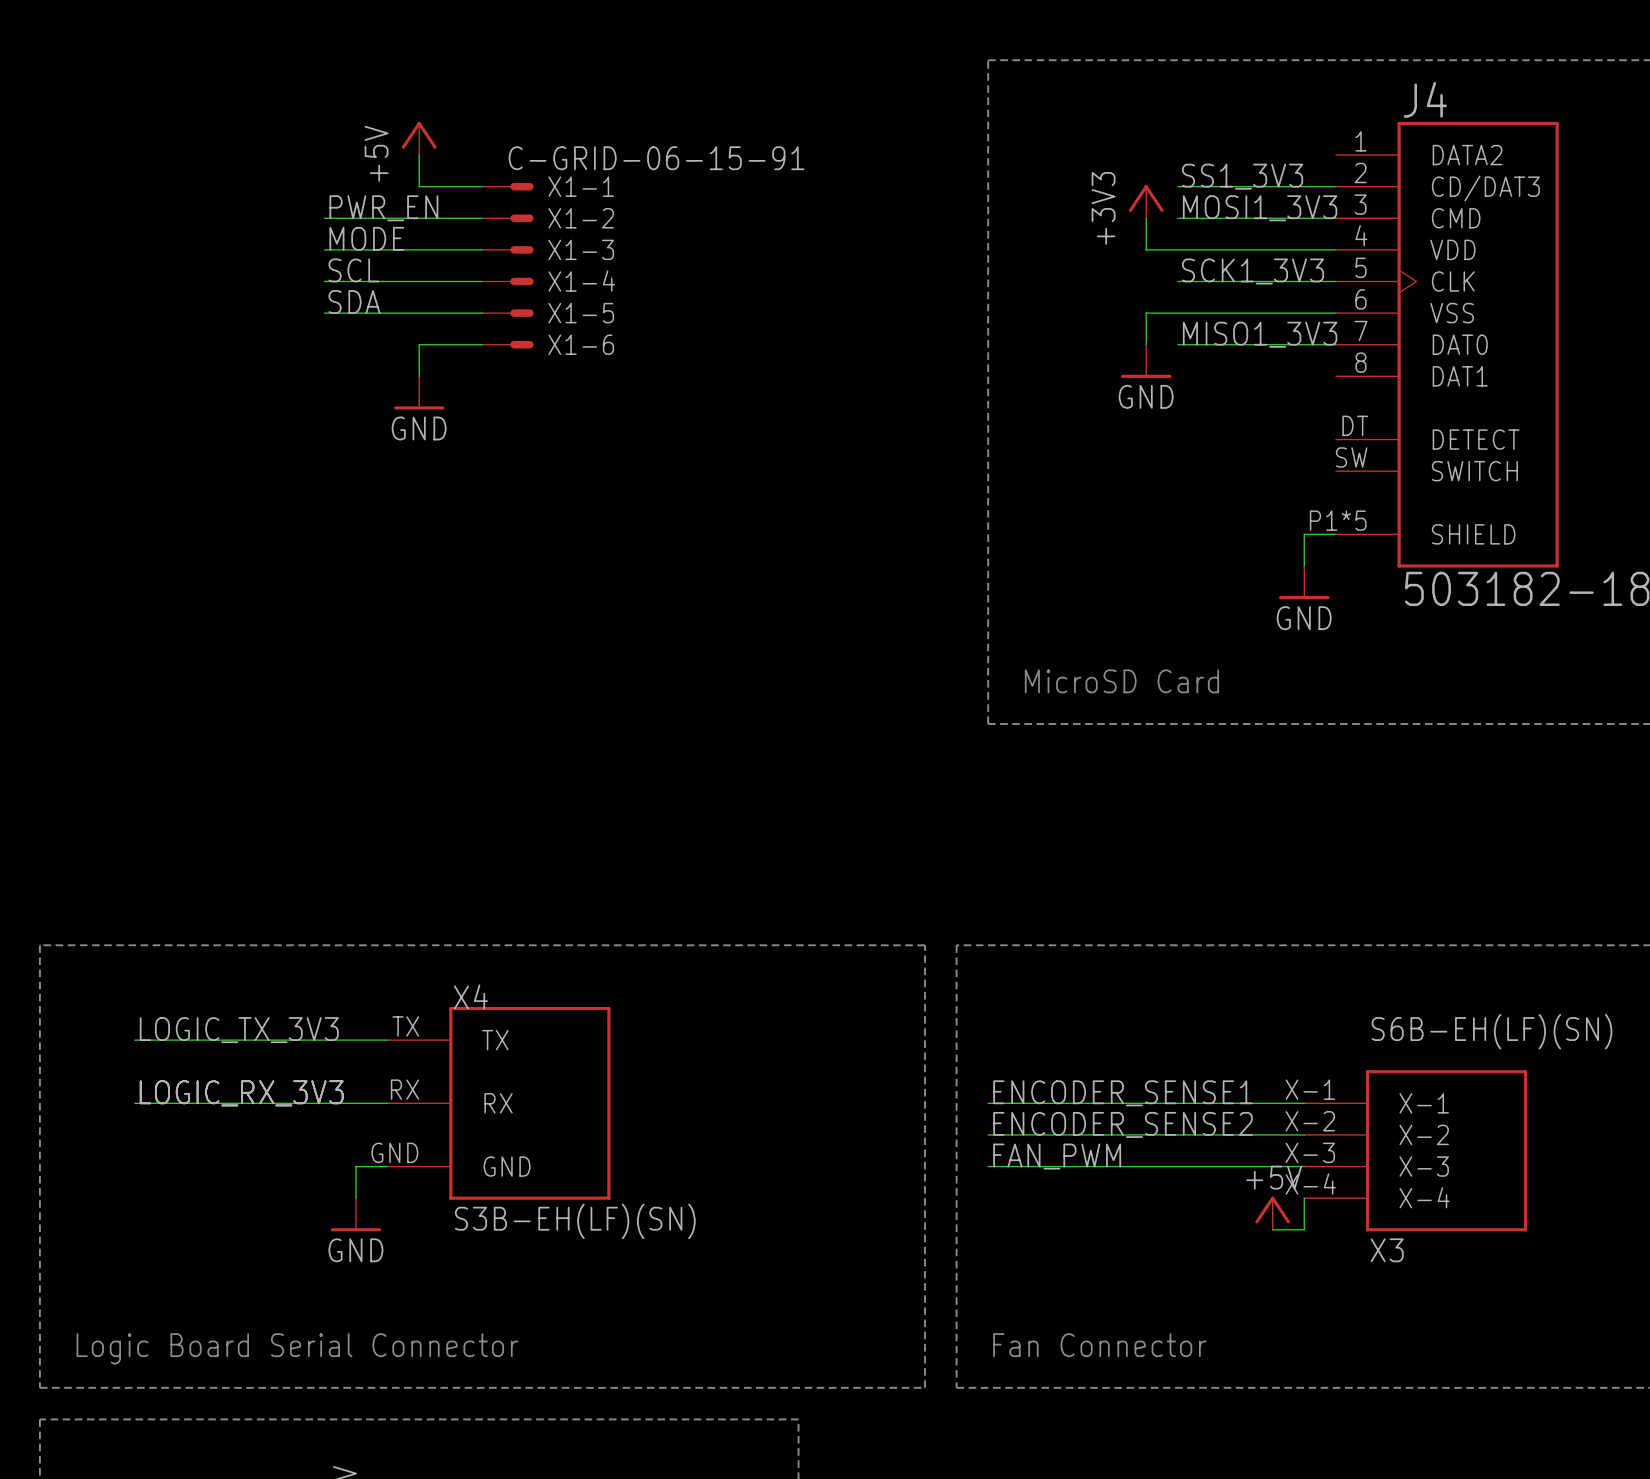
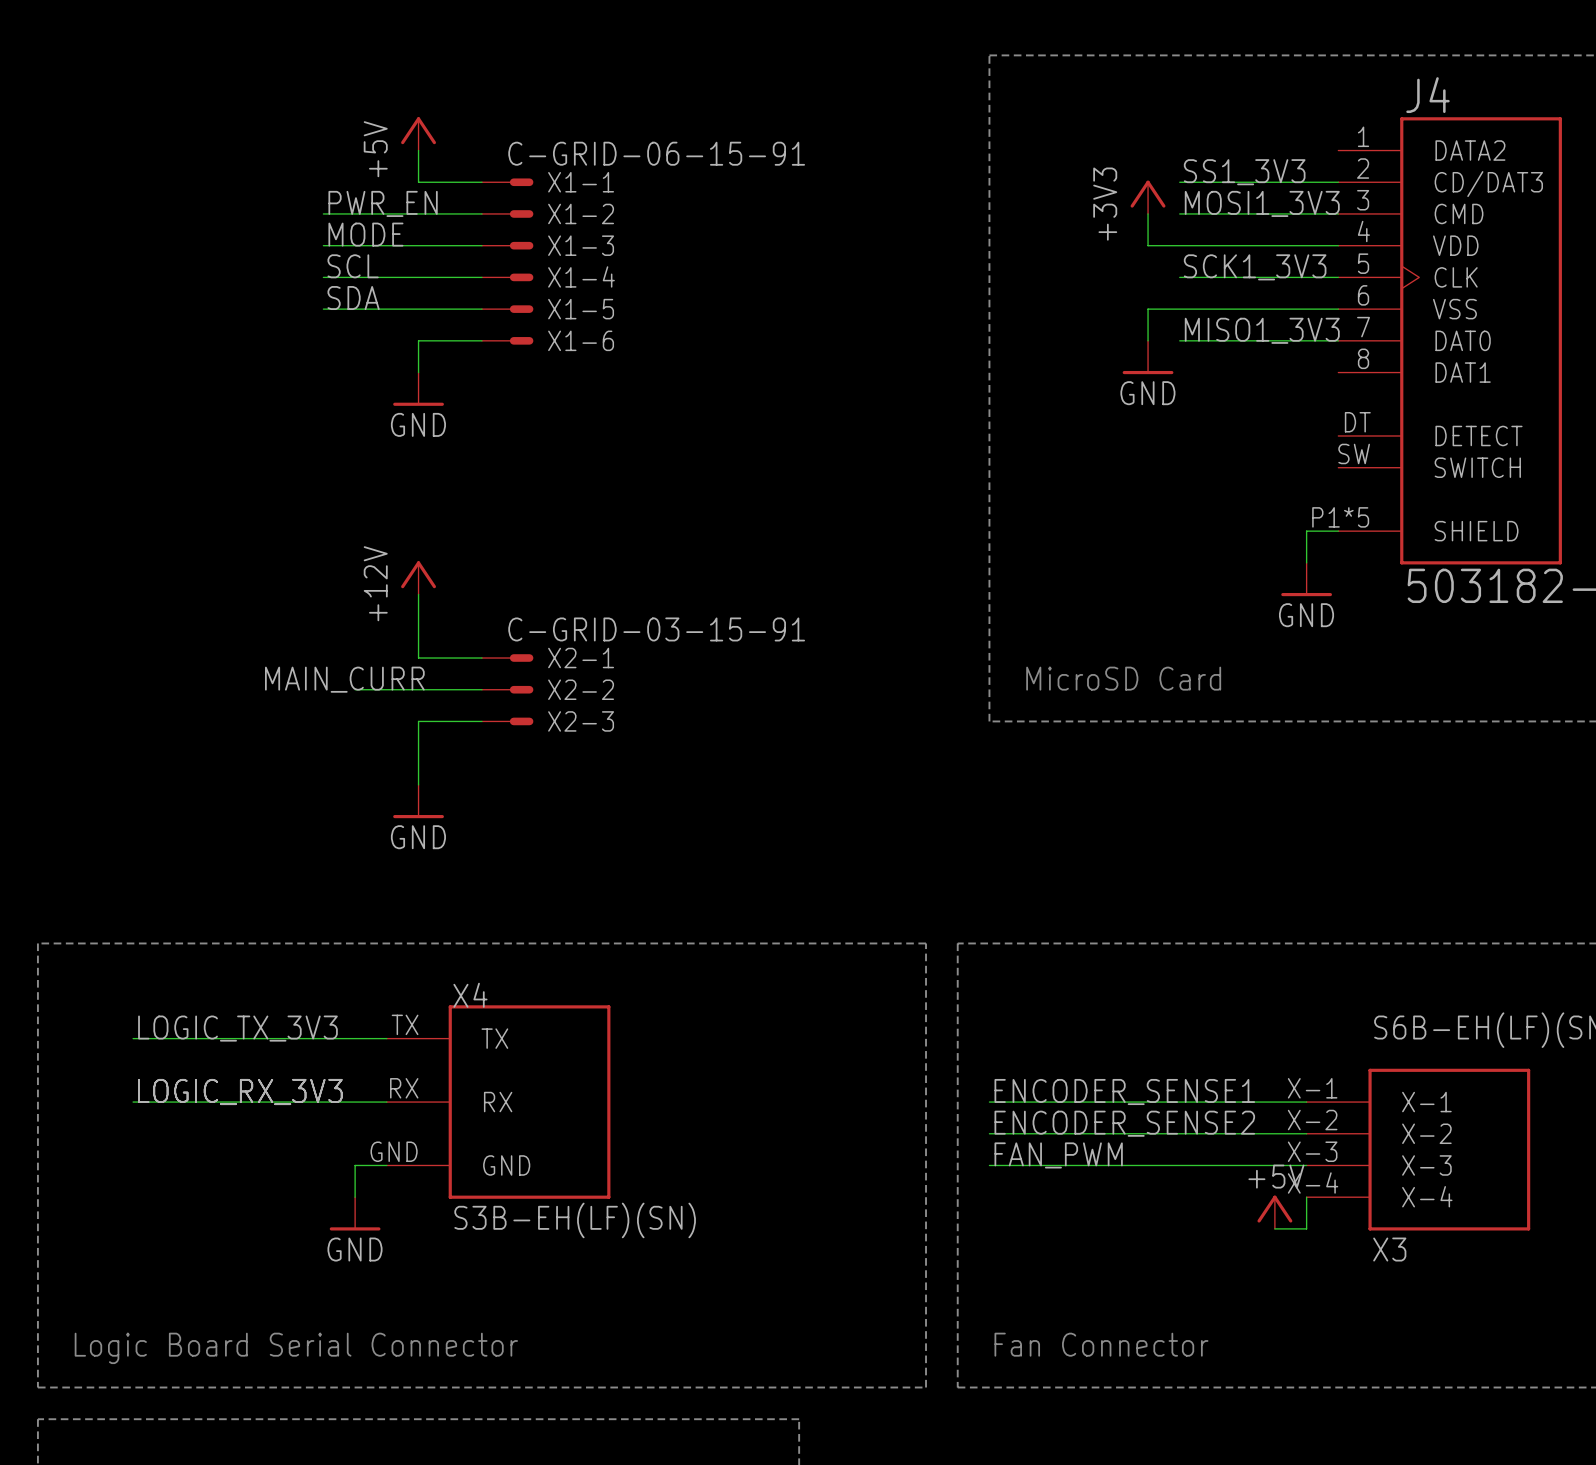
power symbol: none -> +12V (418, 577)
wire: none -> (418, 594) (418, 658) (481, 658)
X2-1: none -> C-GRID-03-15-91 (507, 658)
label: none -> MAIN_CURR (344, 679)
wire: none -> (355, 689) (481, 689)
X2-2: none -> (507, 689)
wire: none -> (481, 721) (418, 721) (418, 784)
X2-3: none -> (507, 721)
power symbol: none -> GND (418, 801)

